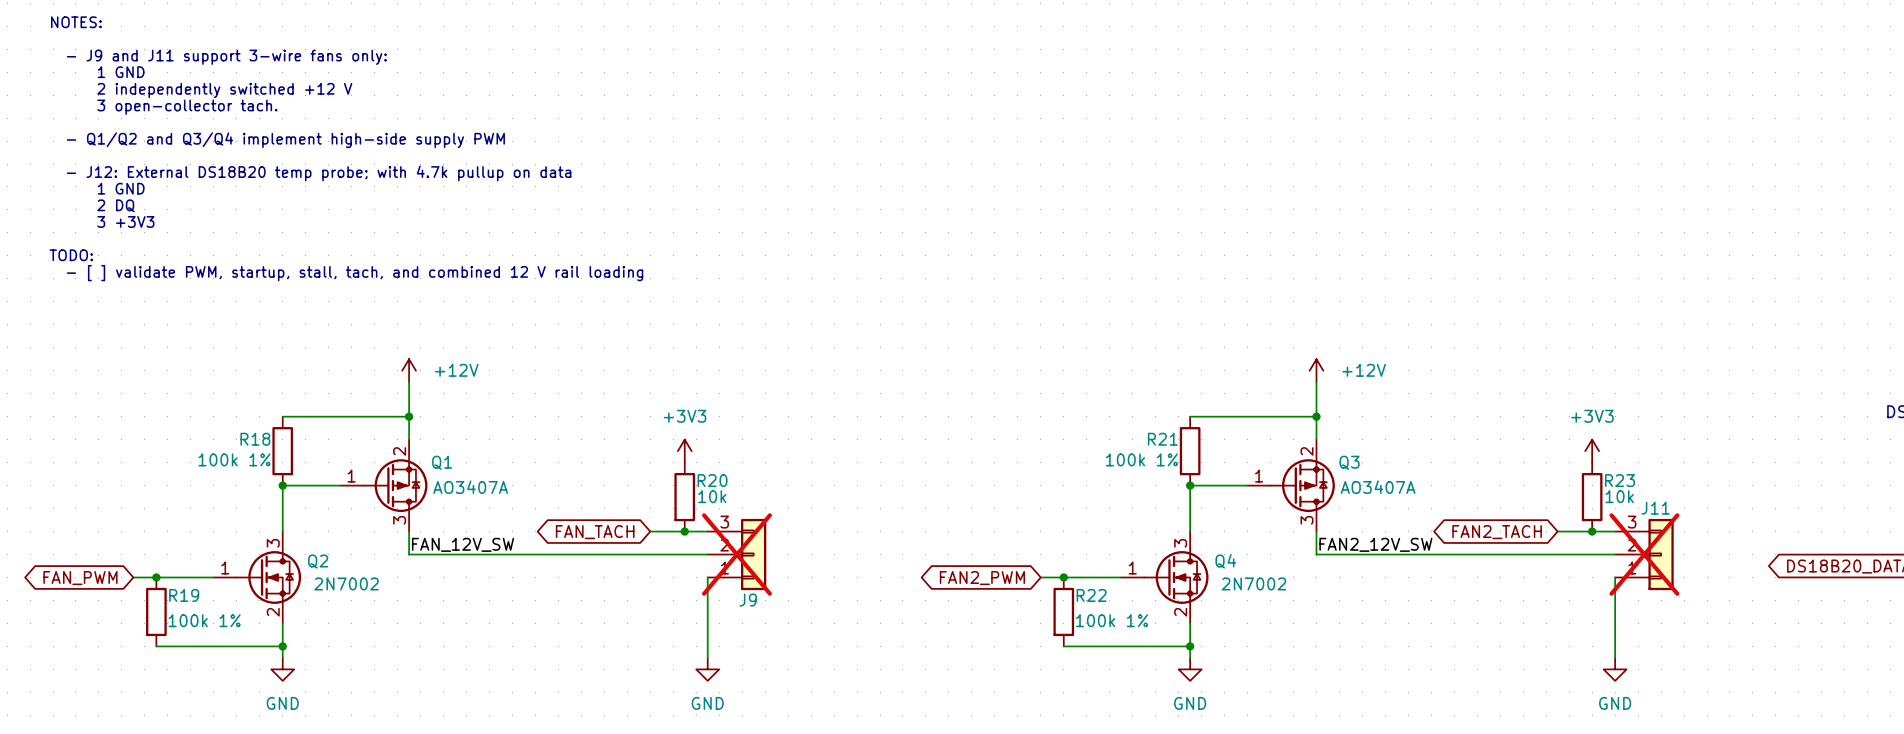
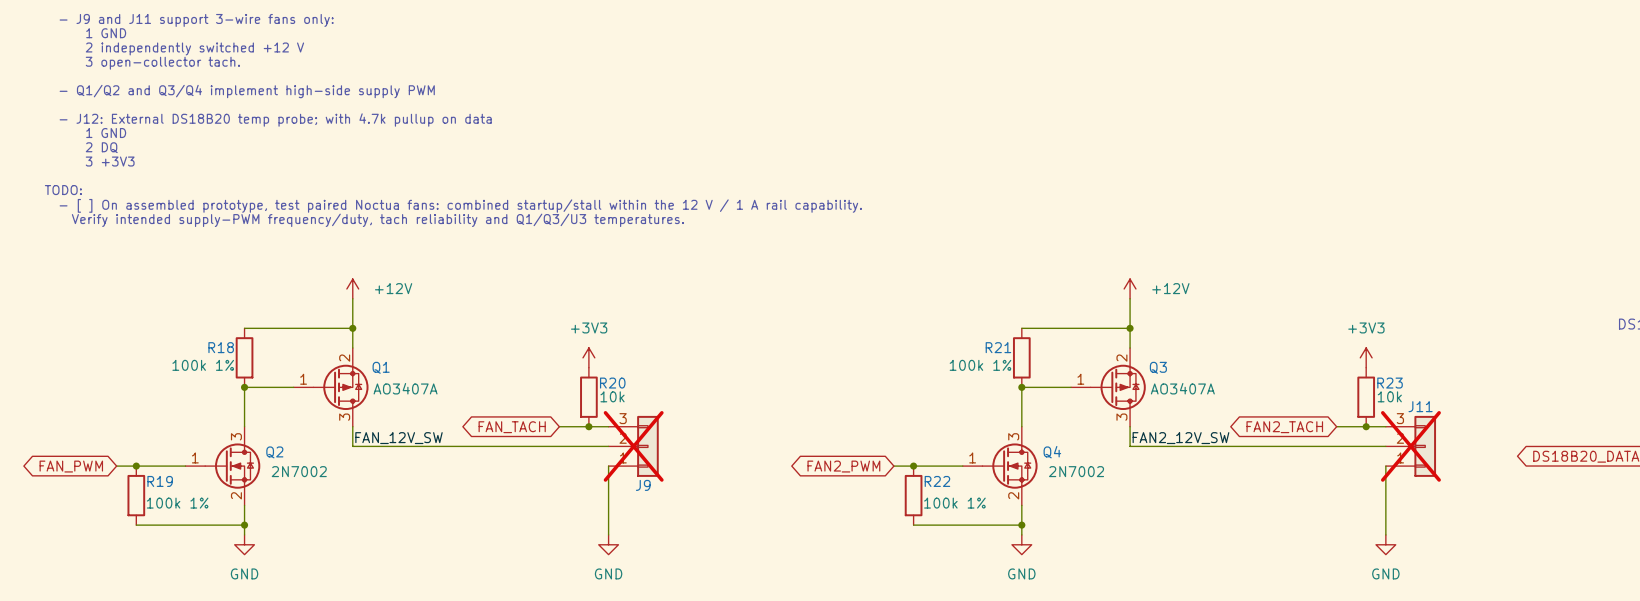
text: - [ ] validate PWM, startup, stall, tach, and combined 12 V rail loading (355, 273) -> - [ ] On assembled prototype, test paired Noctua fans: combined startup/stall within the 12 V / 1 A rail capability. (460, 205)
text: none -> Verify intended supply-PWM frequency/duty, tach reliability and Q1/Q3/U3 temperatures. (377, 220)

